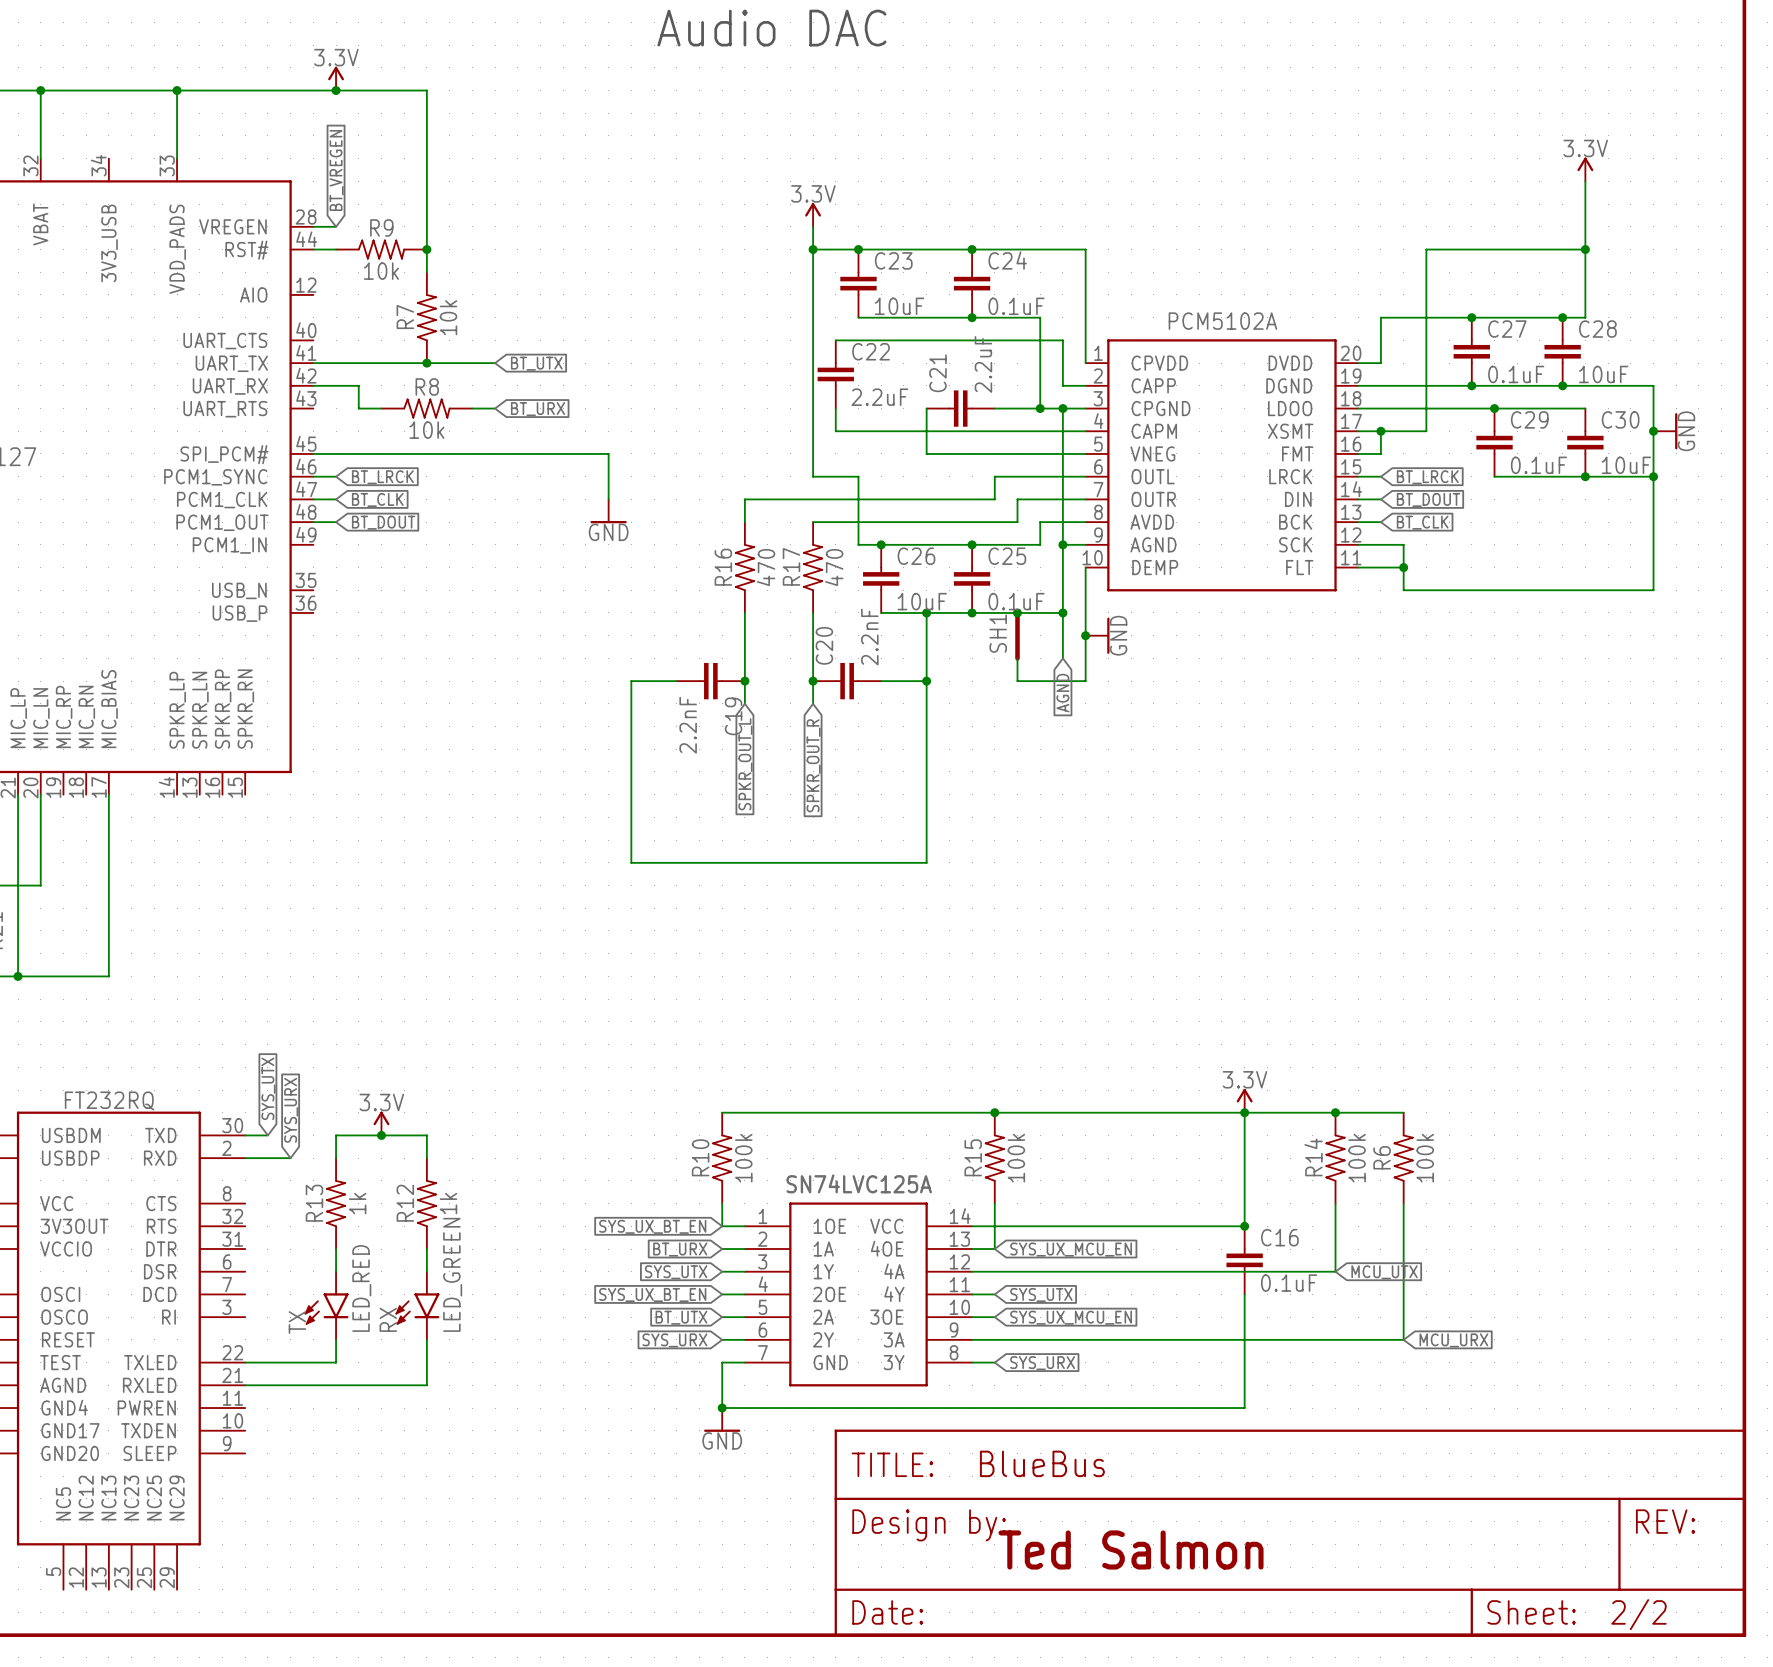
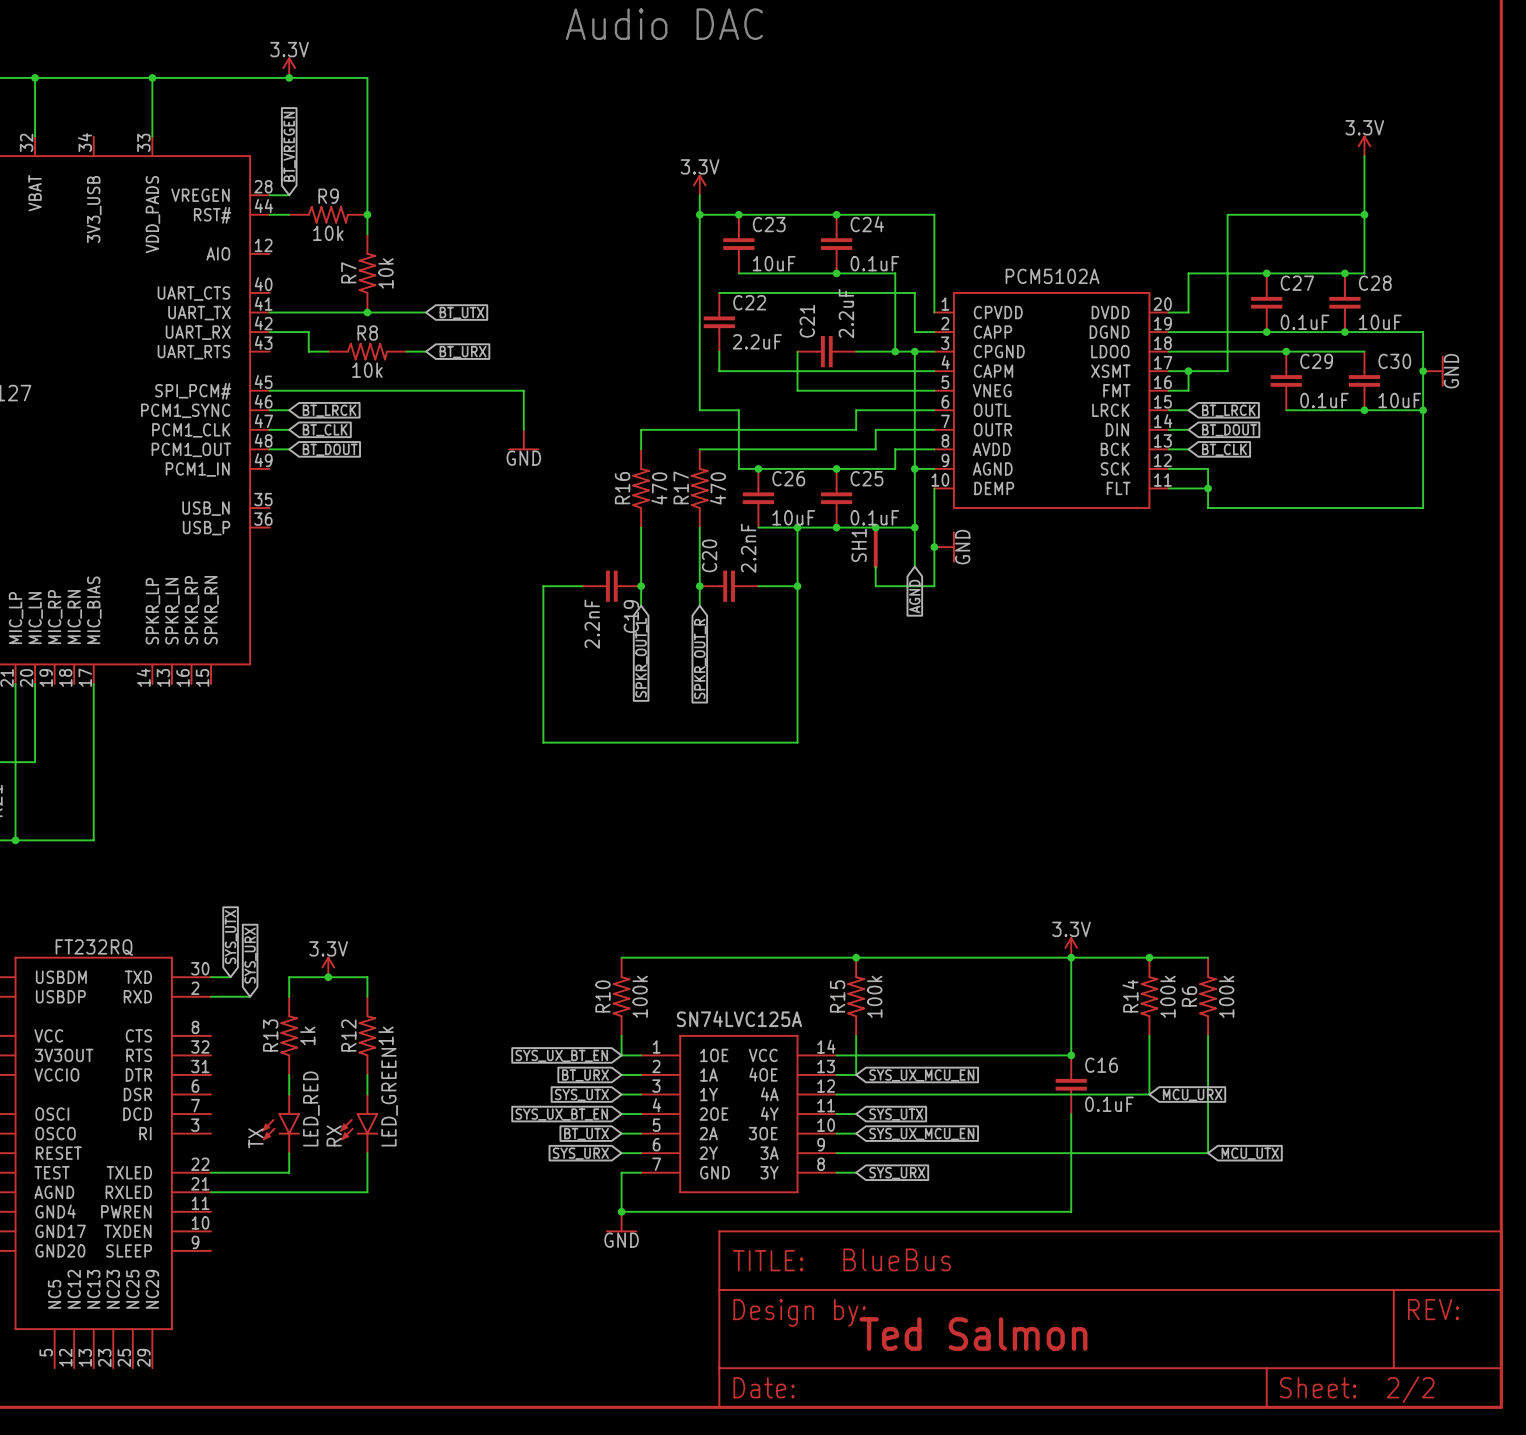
global label: MCU_UTX (1384, 1272) -> MCU_URX (1192, 1094)
global label: MCU_URX (1453, 1340) -> MCU_UTX (1250, 1153)

